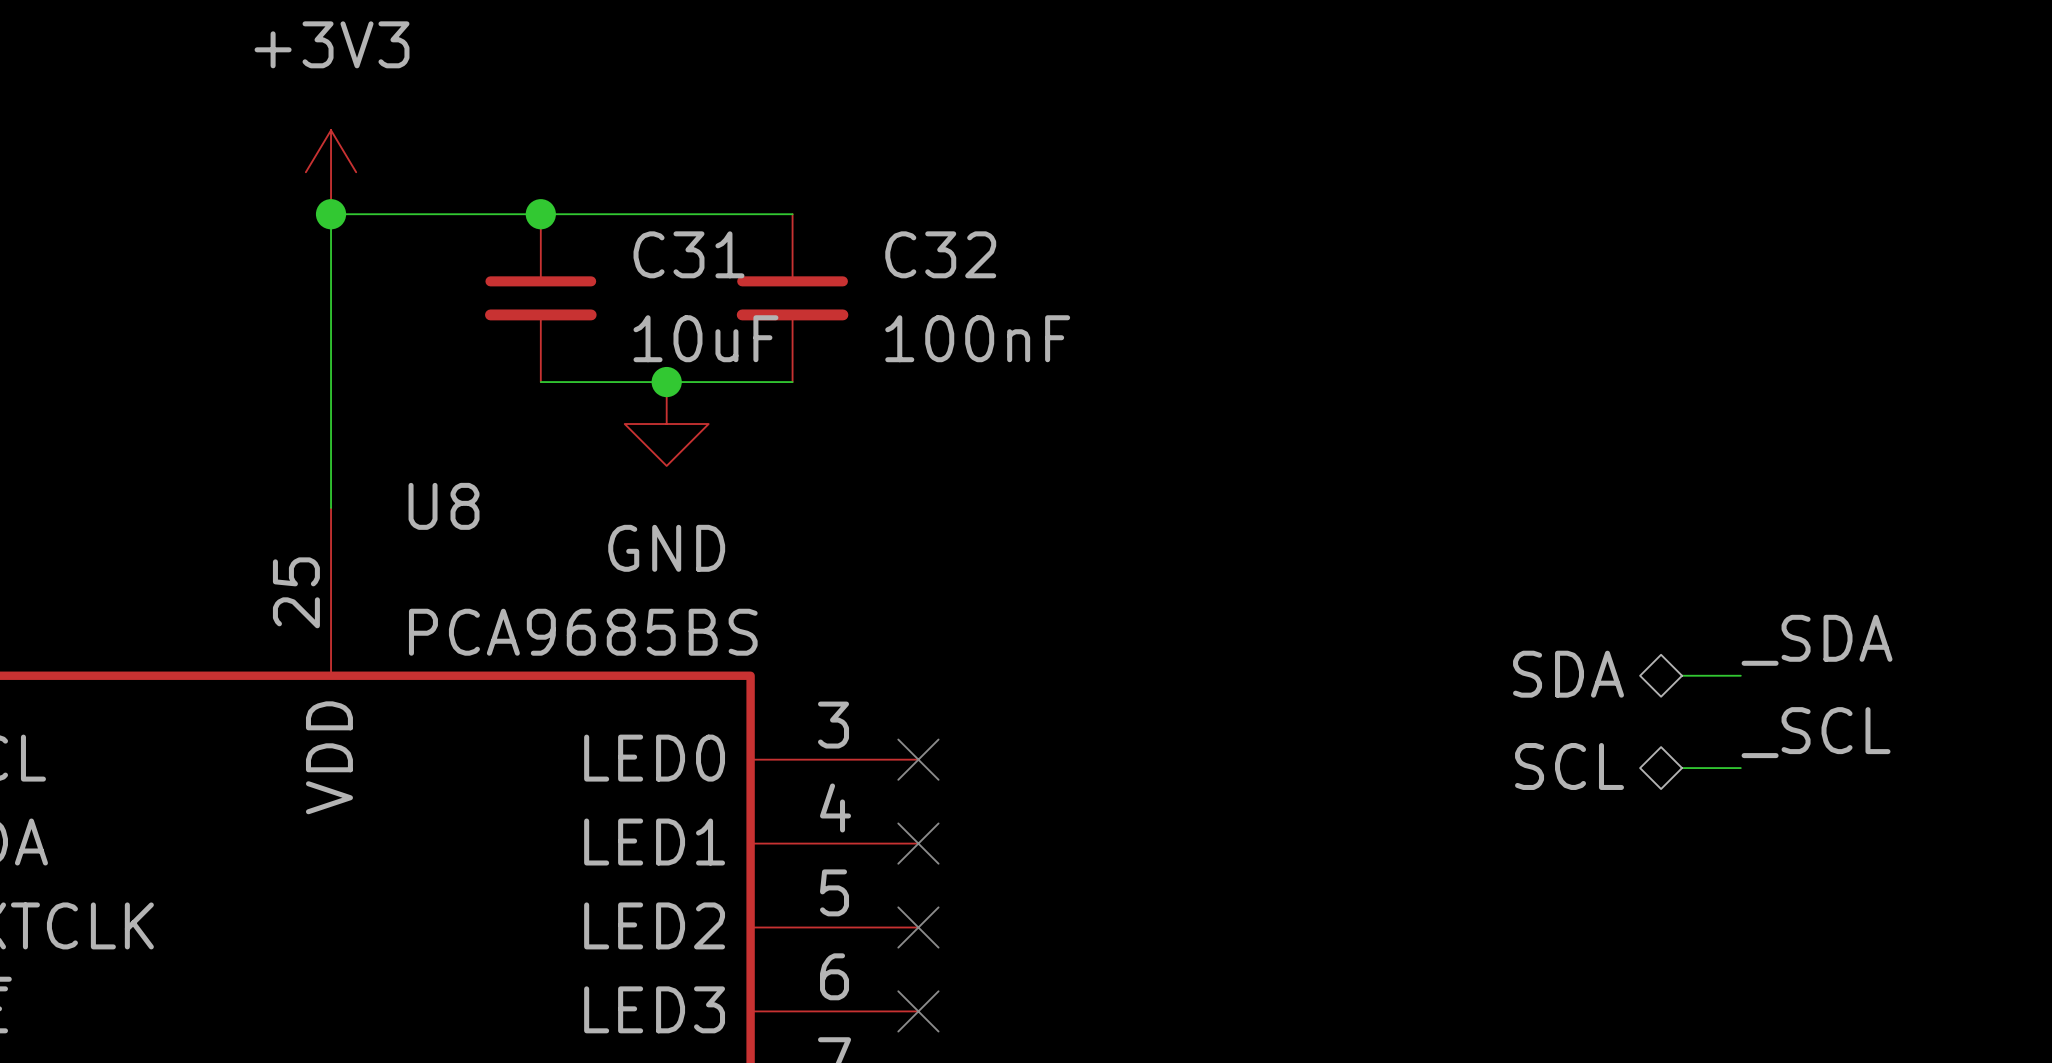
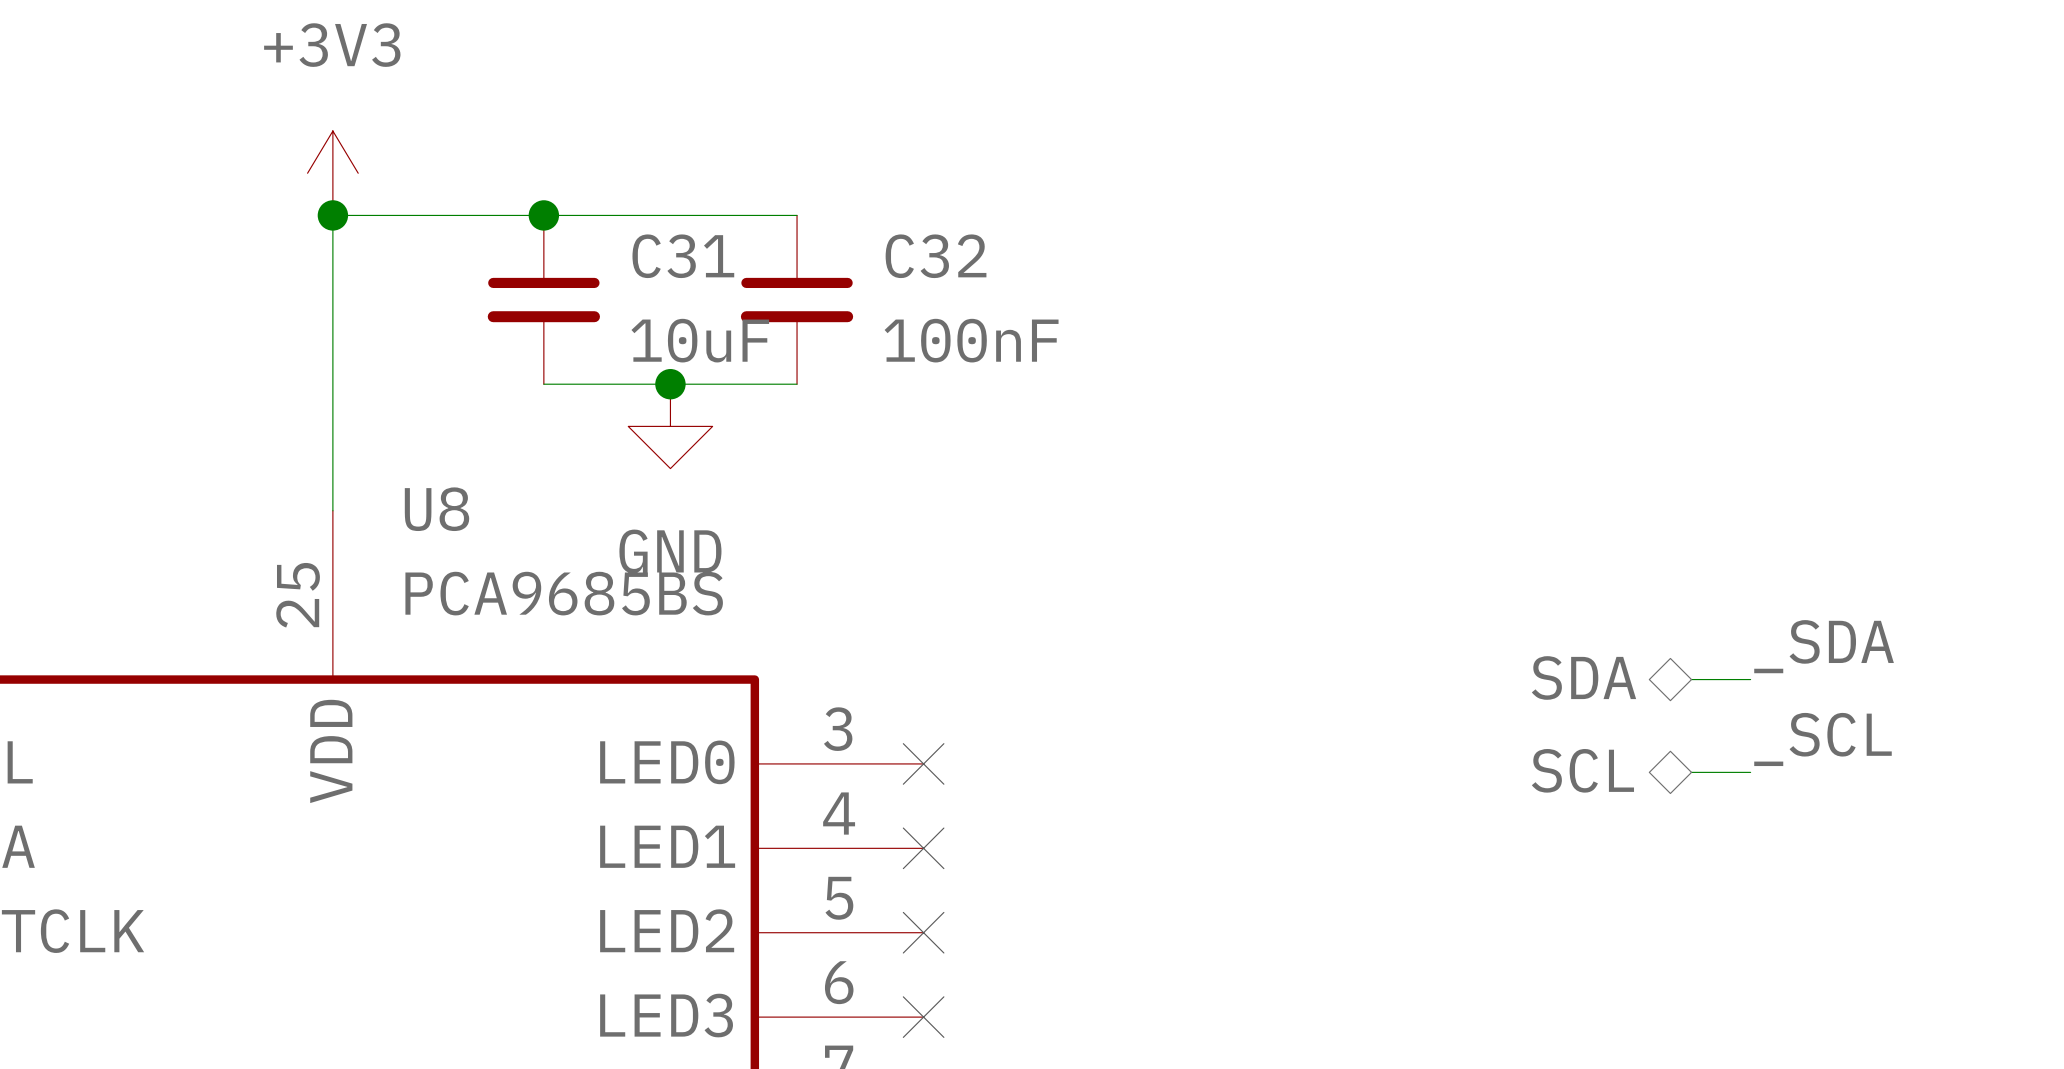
U8 value position: PCA9685BS (583, 632) -> PCA9685BS (564, 593)

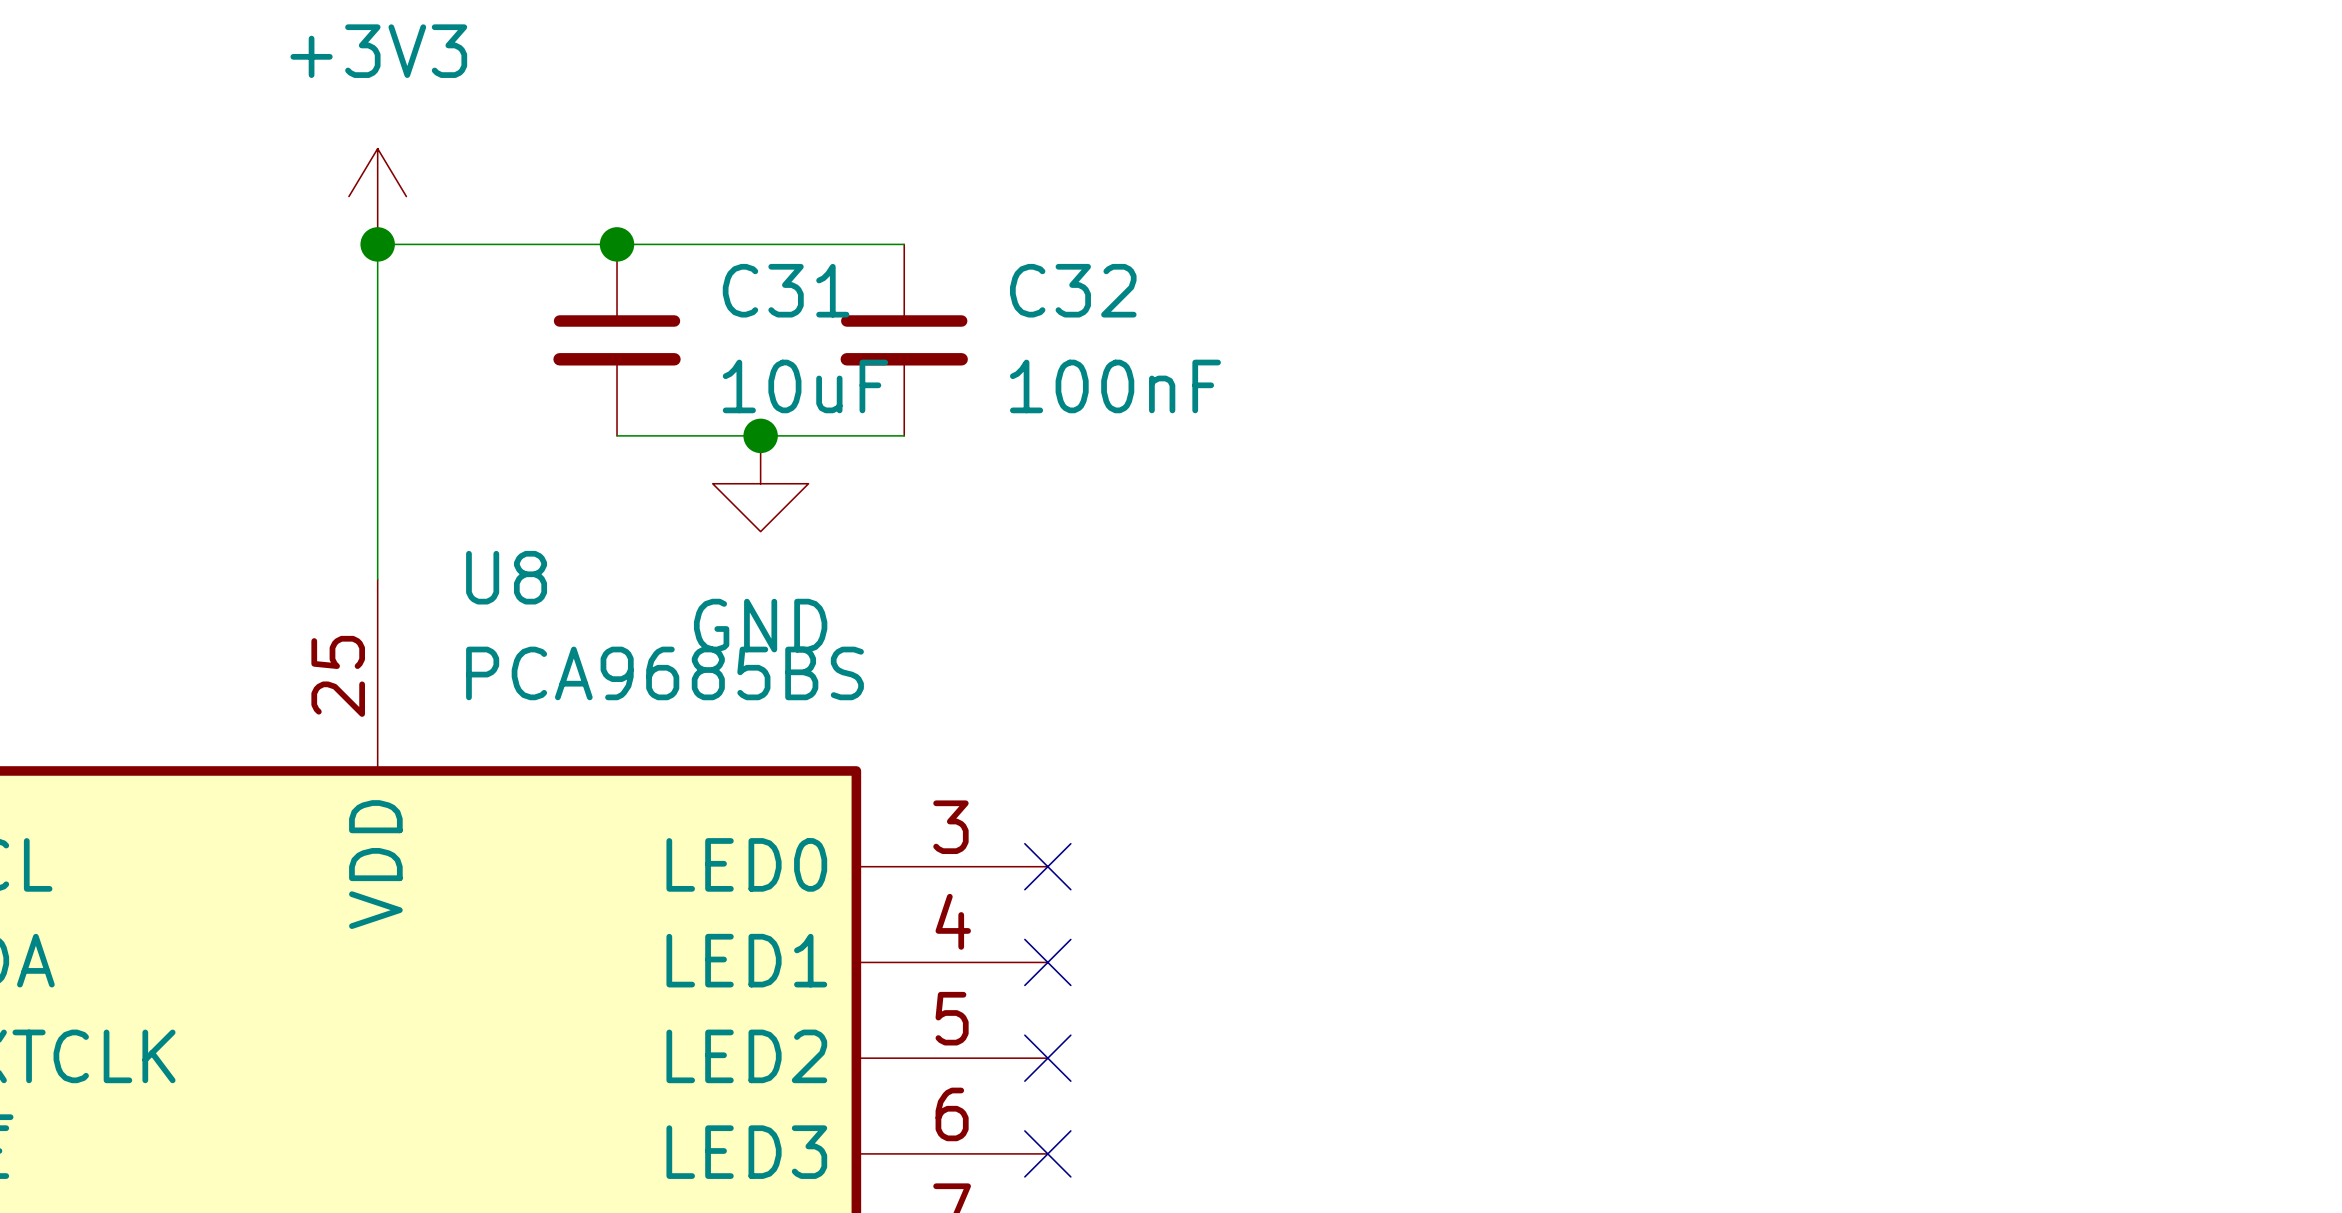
label: _SDA (1824, 646) -> none
hierarchical label: SDA (1583, 677) -> none
wire: (1691, 679) (1750, 679) -> none
label: _SCL (1822, 739) -> none
hierarchical label: SCL (1582, 770) -> none
wire: (1691, 772) (1750, 772) -> none

